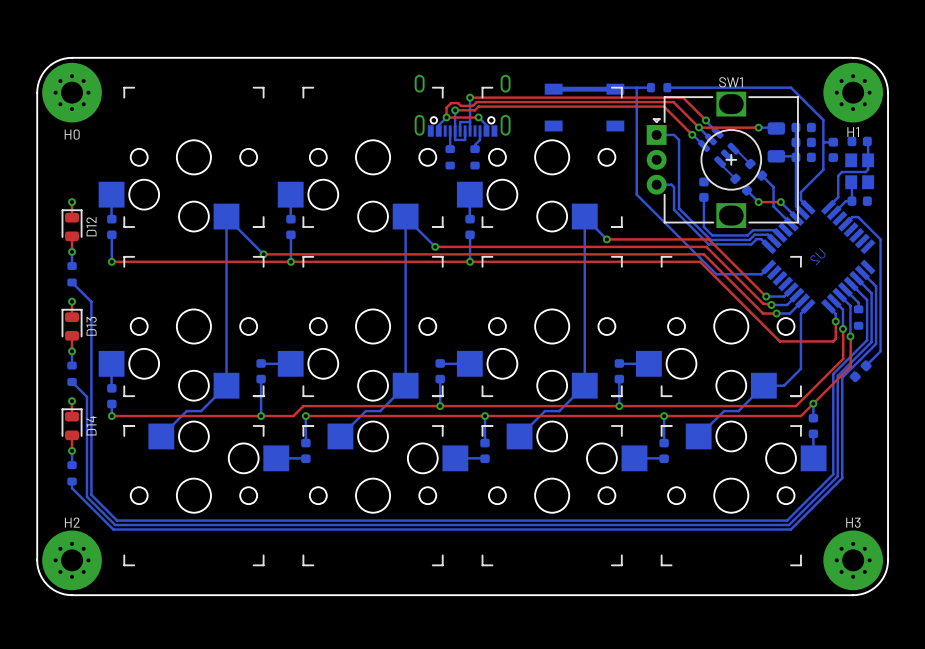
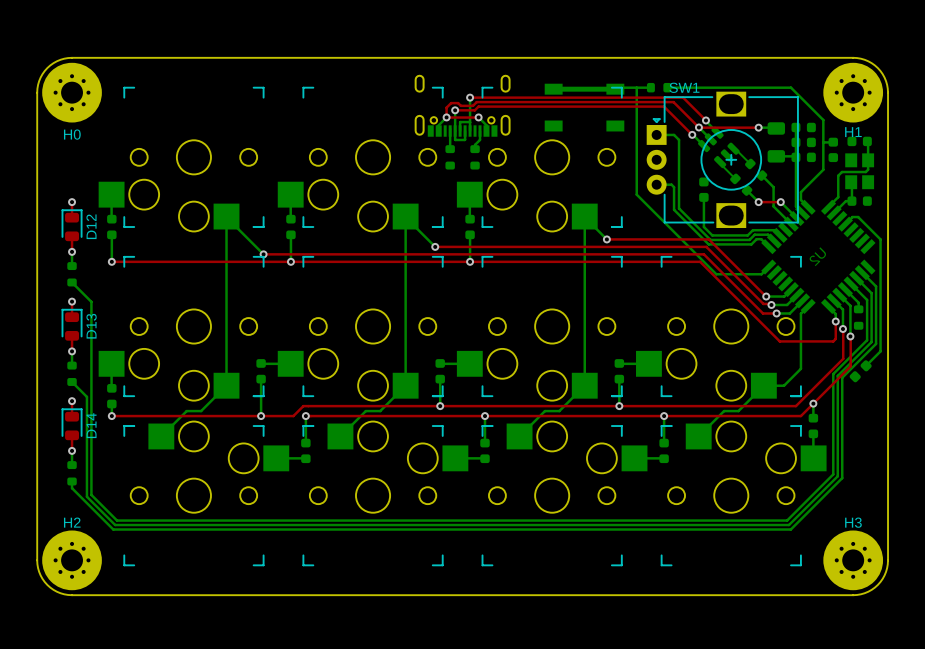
SW1 name position: SW1 (730, 82) -> SW1 (684, 87)

